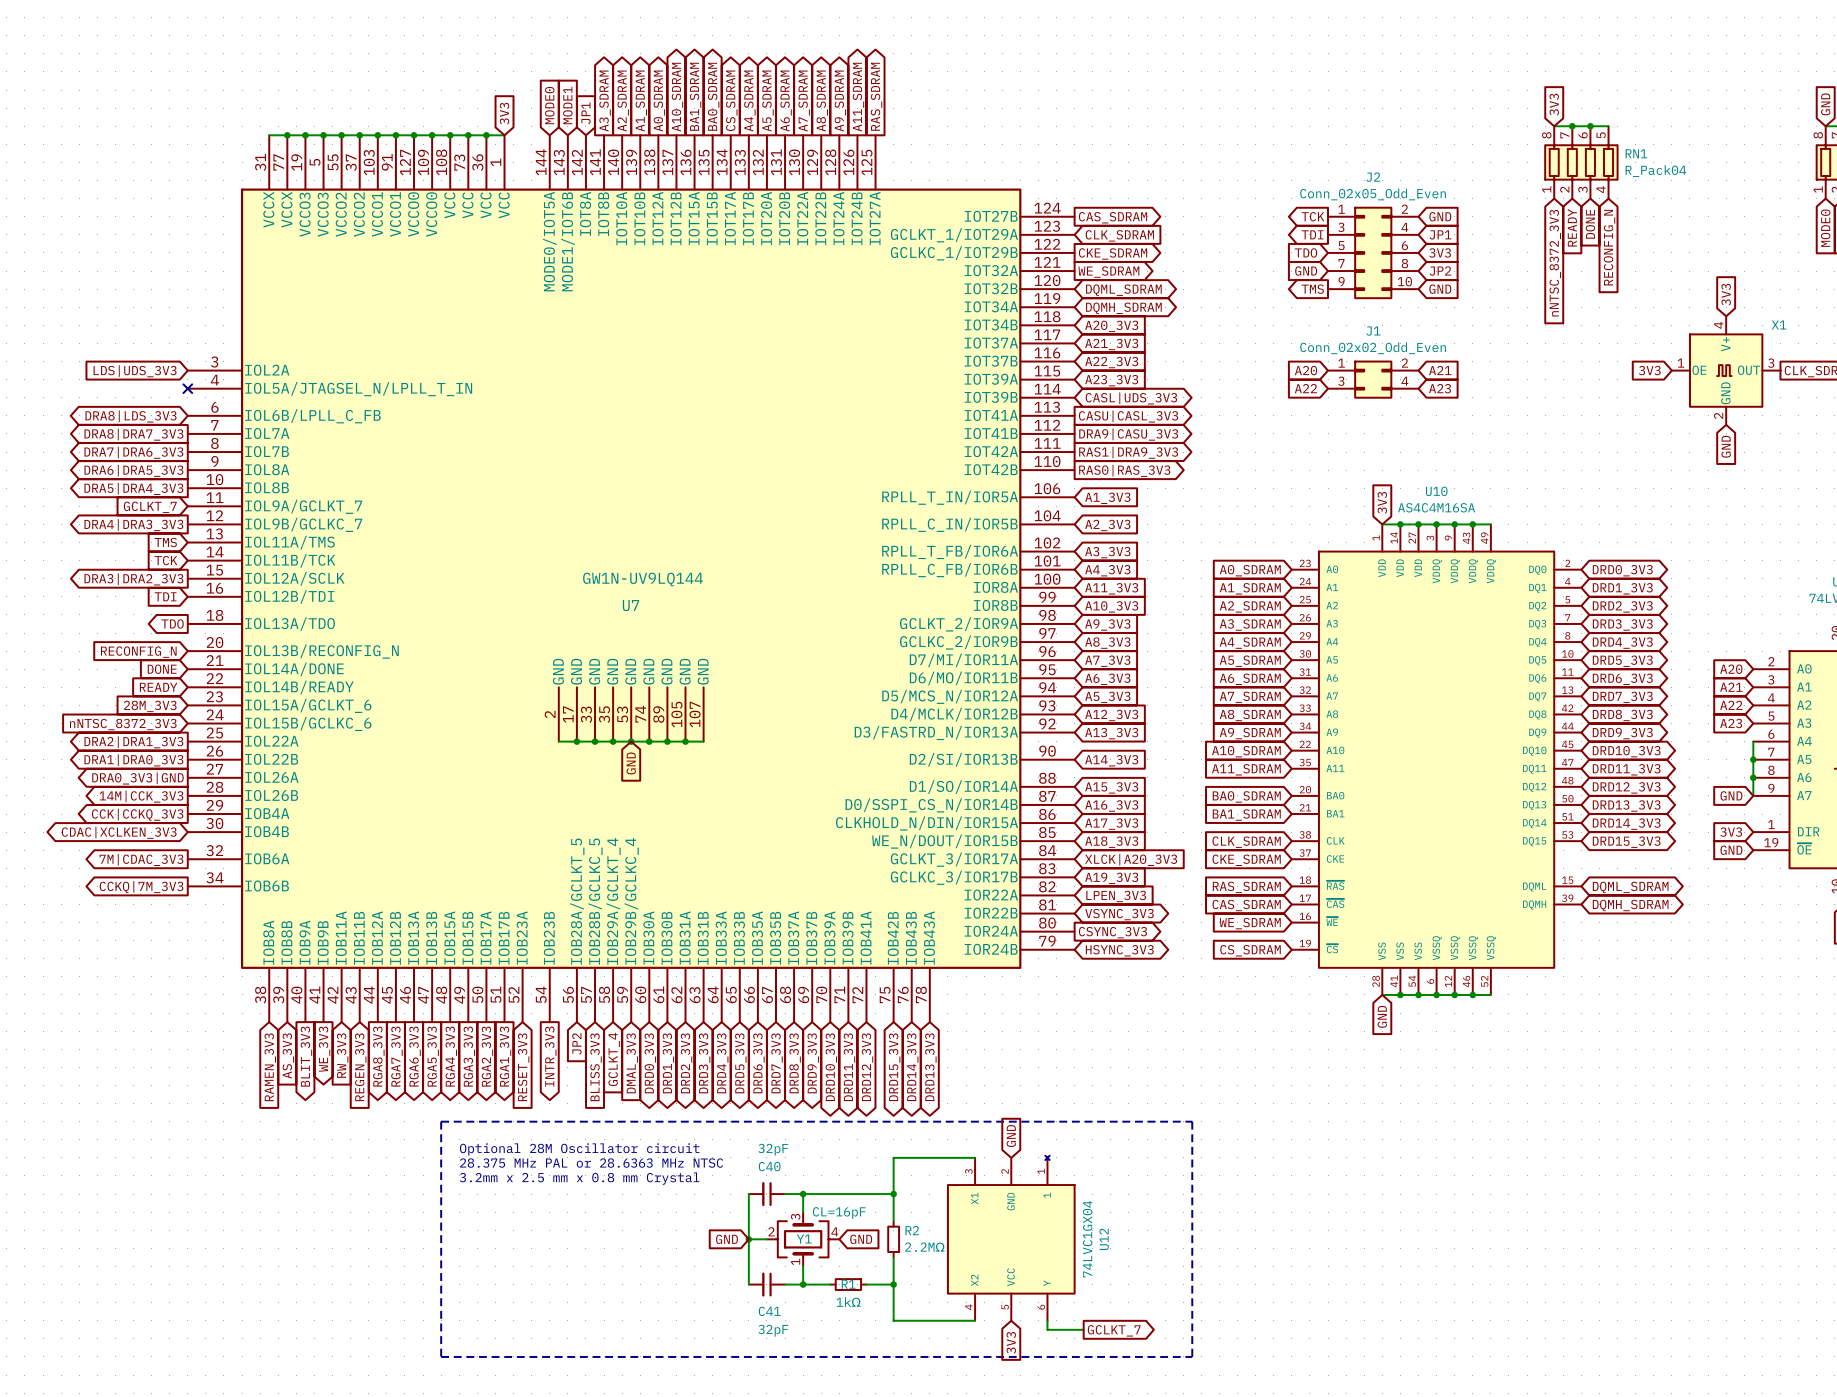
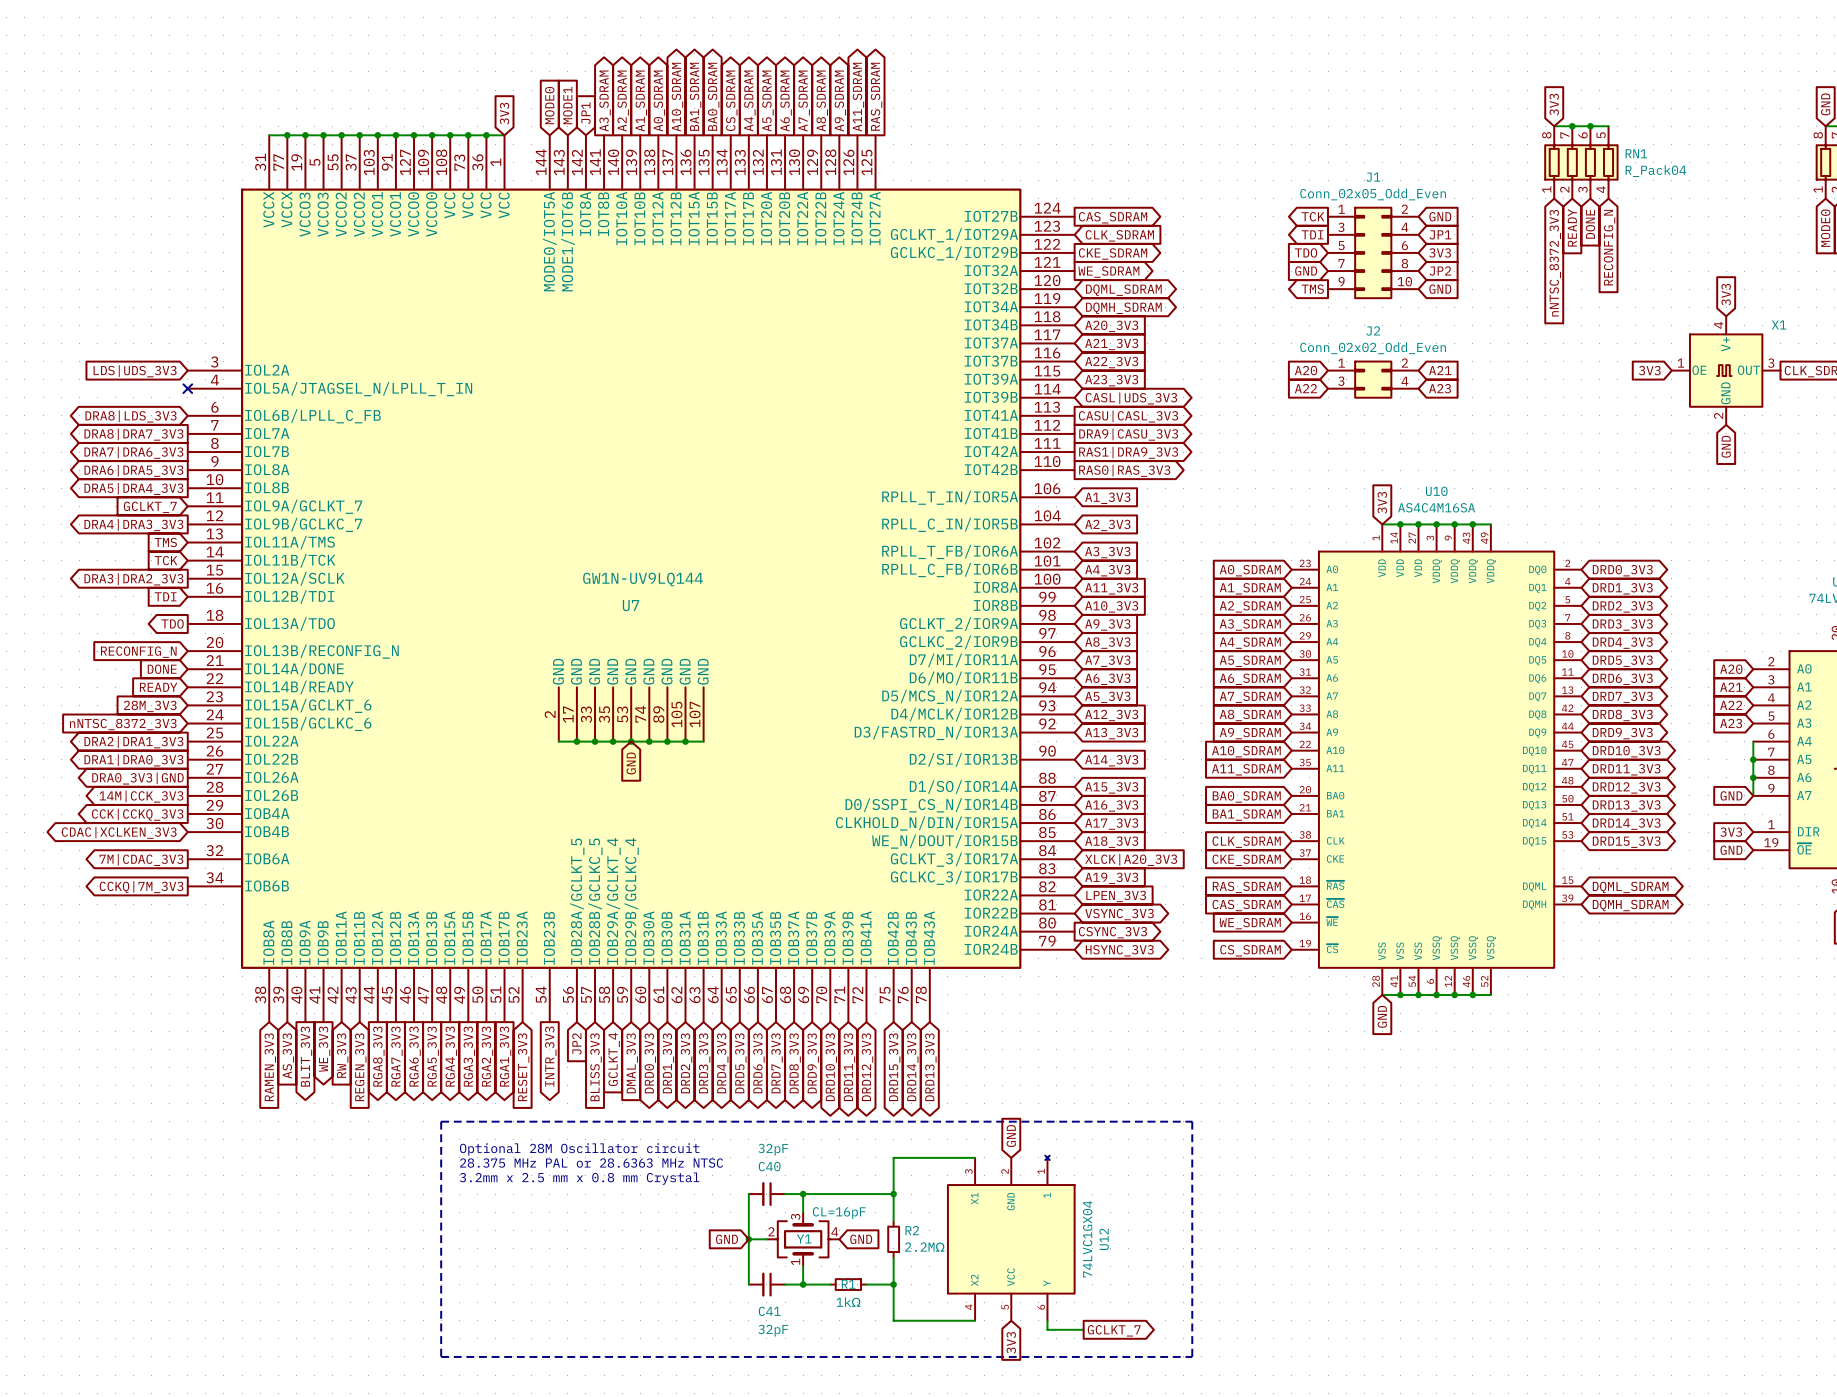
J2 name: J2 (1373, 177) -> J1 (1373, 177)
J1 name: J1 (1373, 331) -> J2 (1373, 330)

